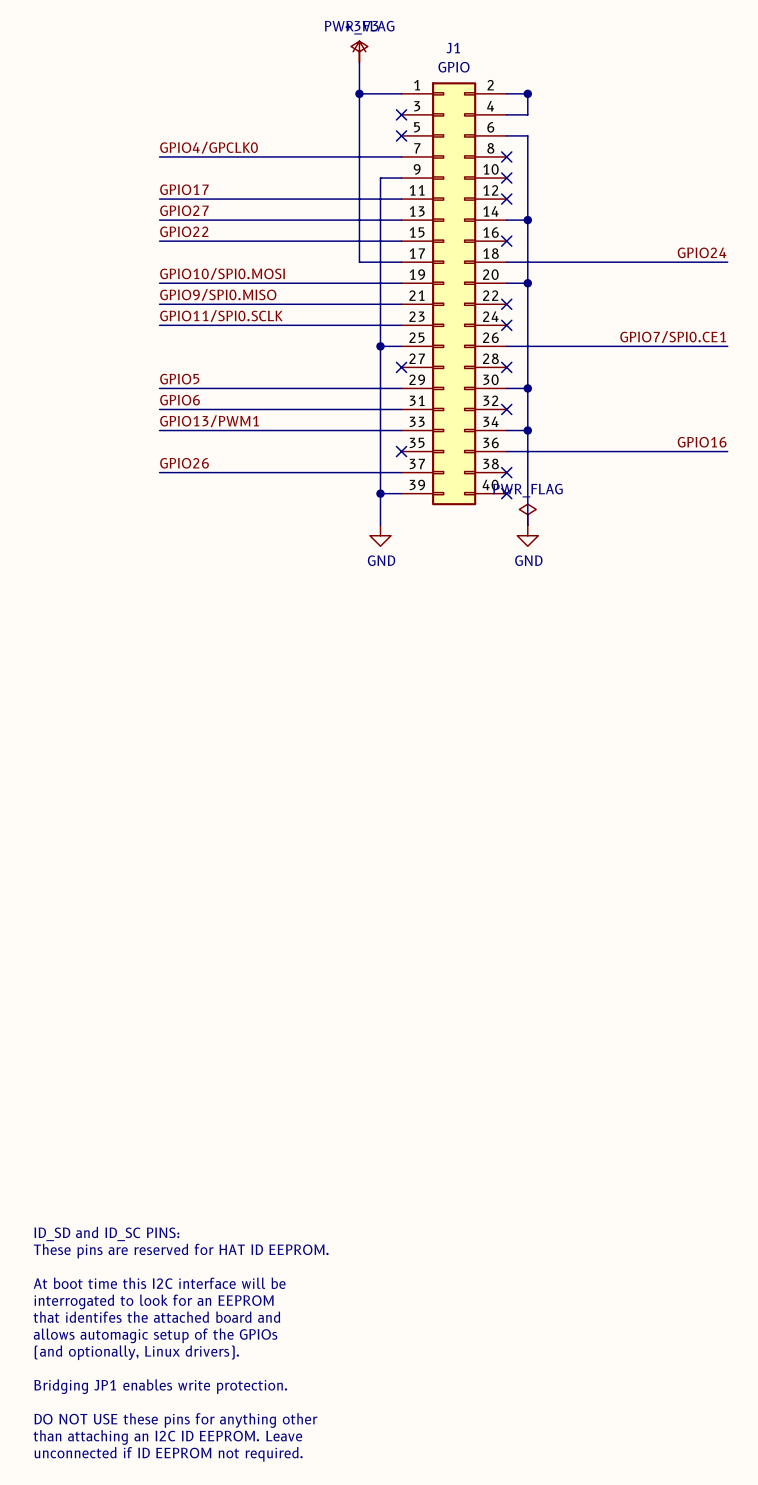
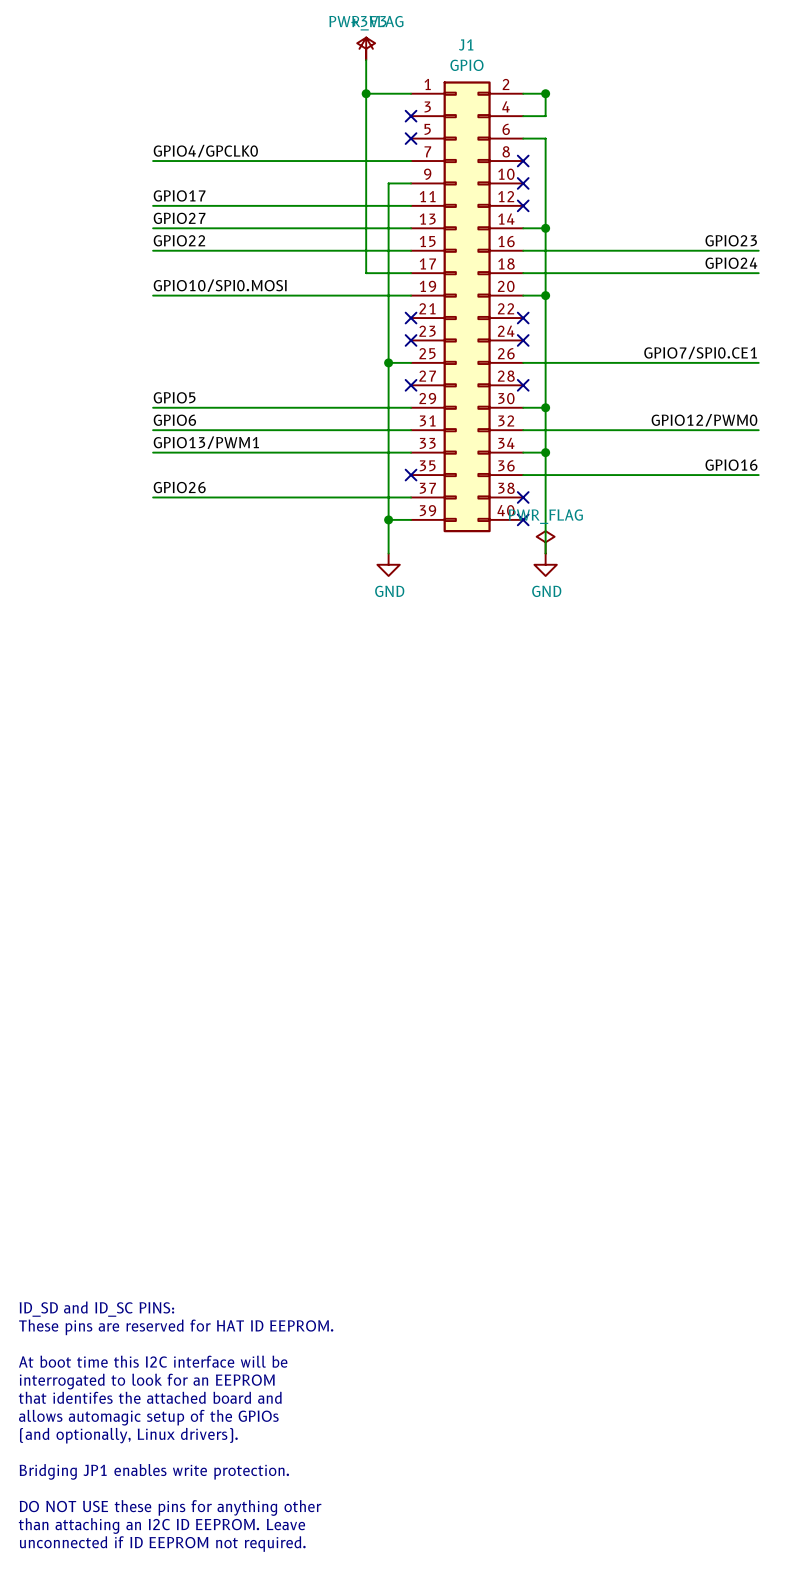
label: none -> GPIO23 (731, 240)
wire: none -> (523, 250) (758, 250)
no-connect mark: (506, 241) -> none
label: GPIO9/SPI0.MISO (218, 294) -> none
wire: (159, 304) (401, 304) -> none
no-connect mark: none -> (411, 318)
label: GPIO11/SPI0.SCLK (221, 315) -> none
wire: (159, 325) (401, 325) -> none
no-connect mark: none -> (411, 340)
label: none -> GPIO12/PWM0 (704, 420)
wire: none -> (523, 430) (758, 430)
no-connect mark: (506, 409) -> none

